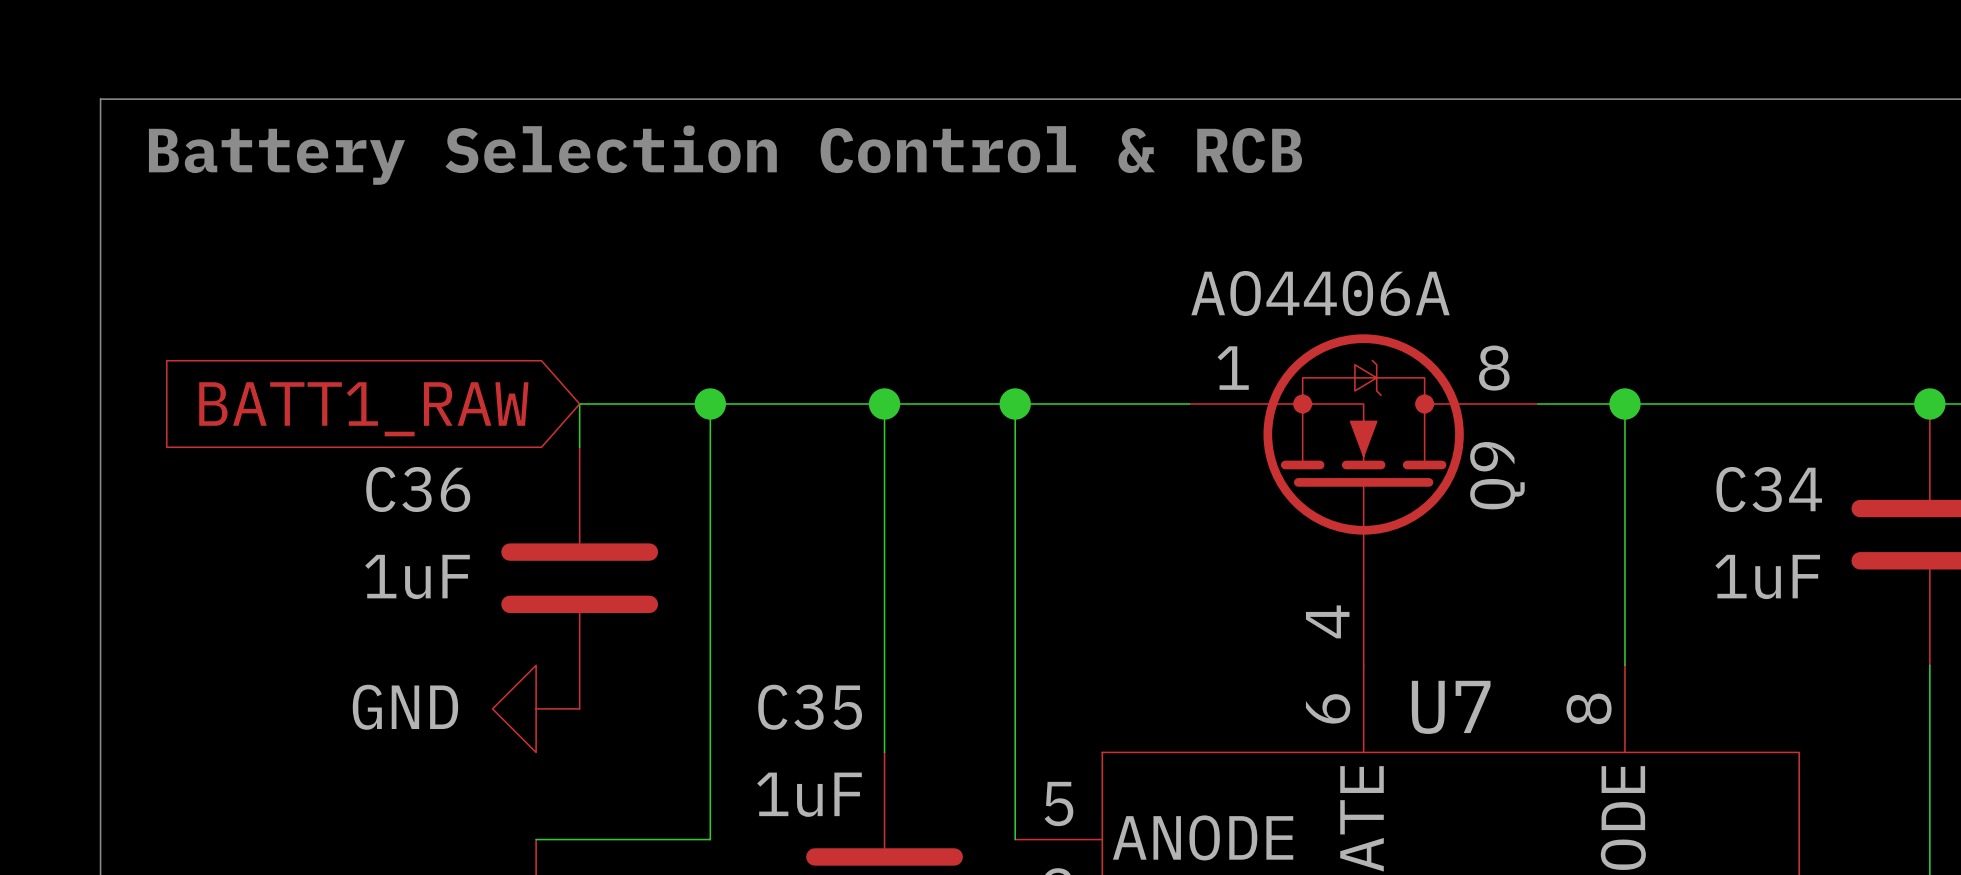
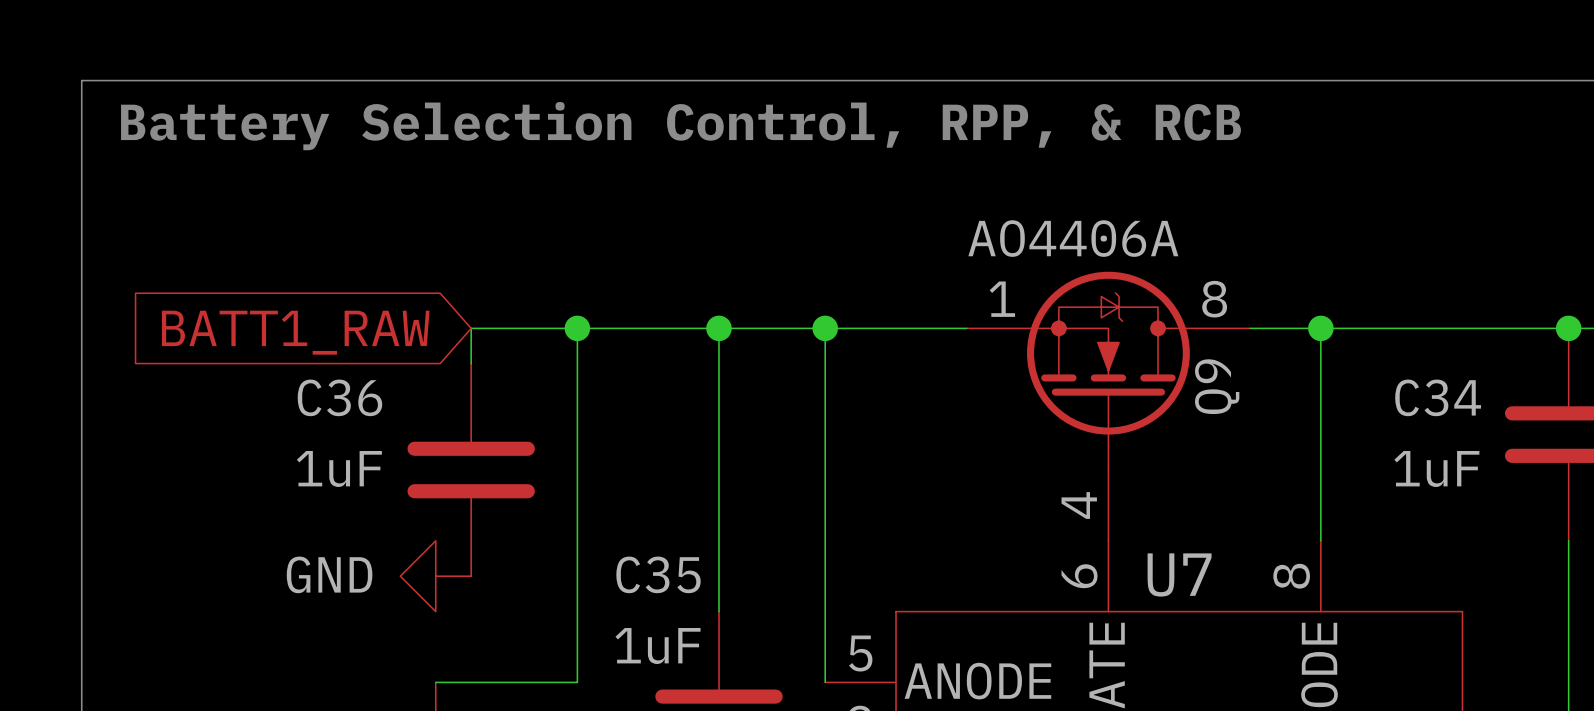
text: Battery Selection Control & RCB (725, 155) -> Battery Selection Control, RPP, & RCB (681, 126)

